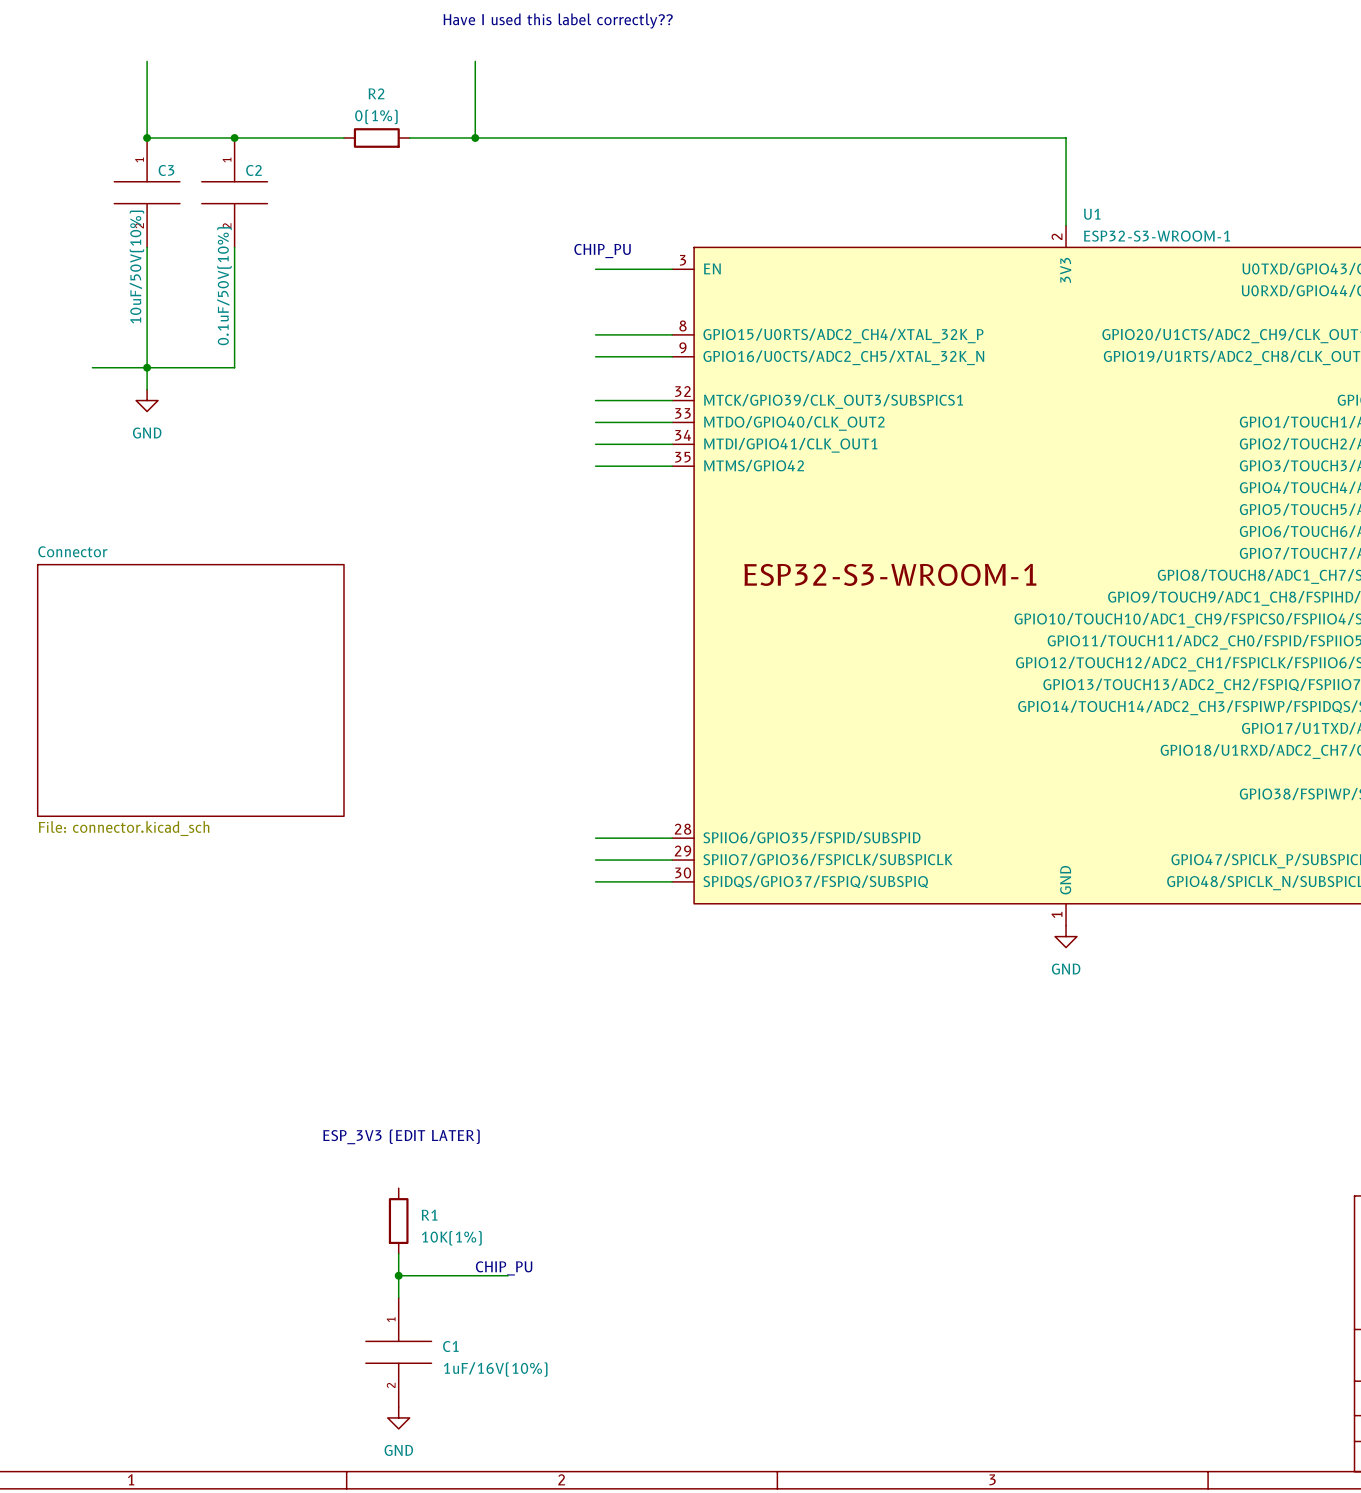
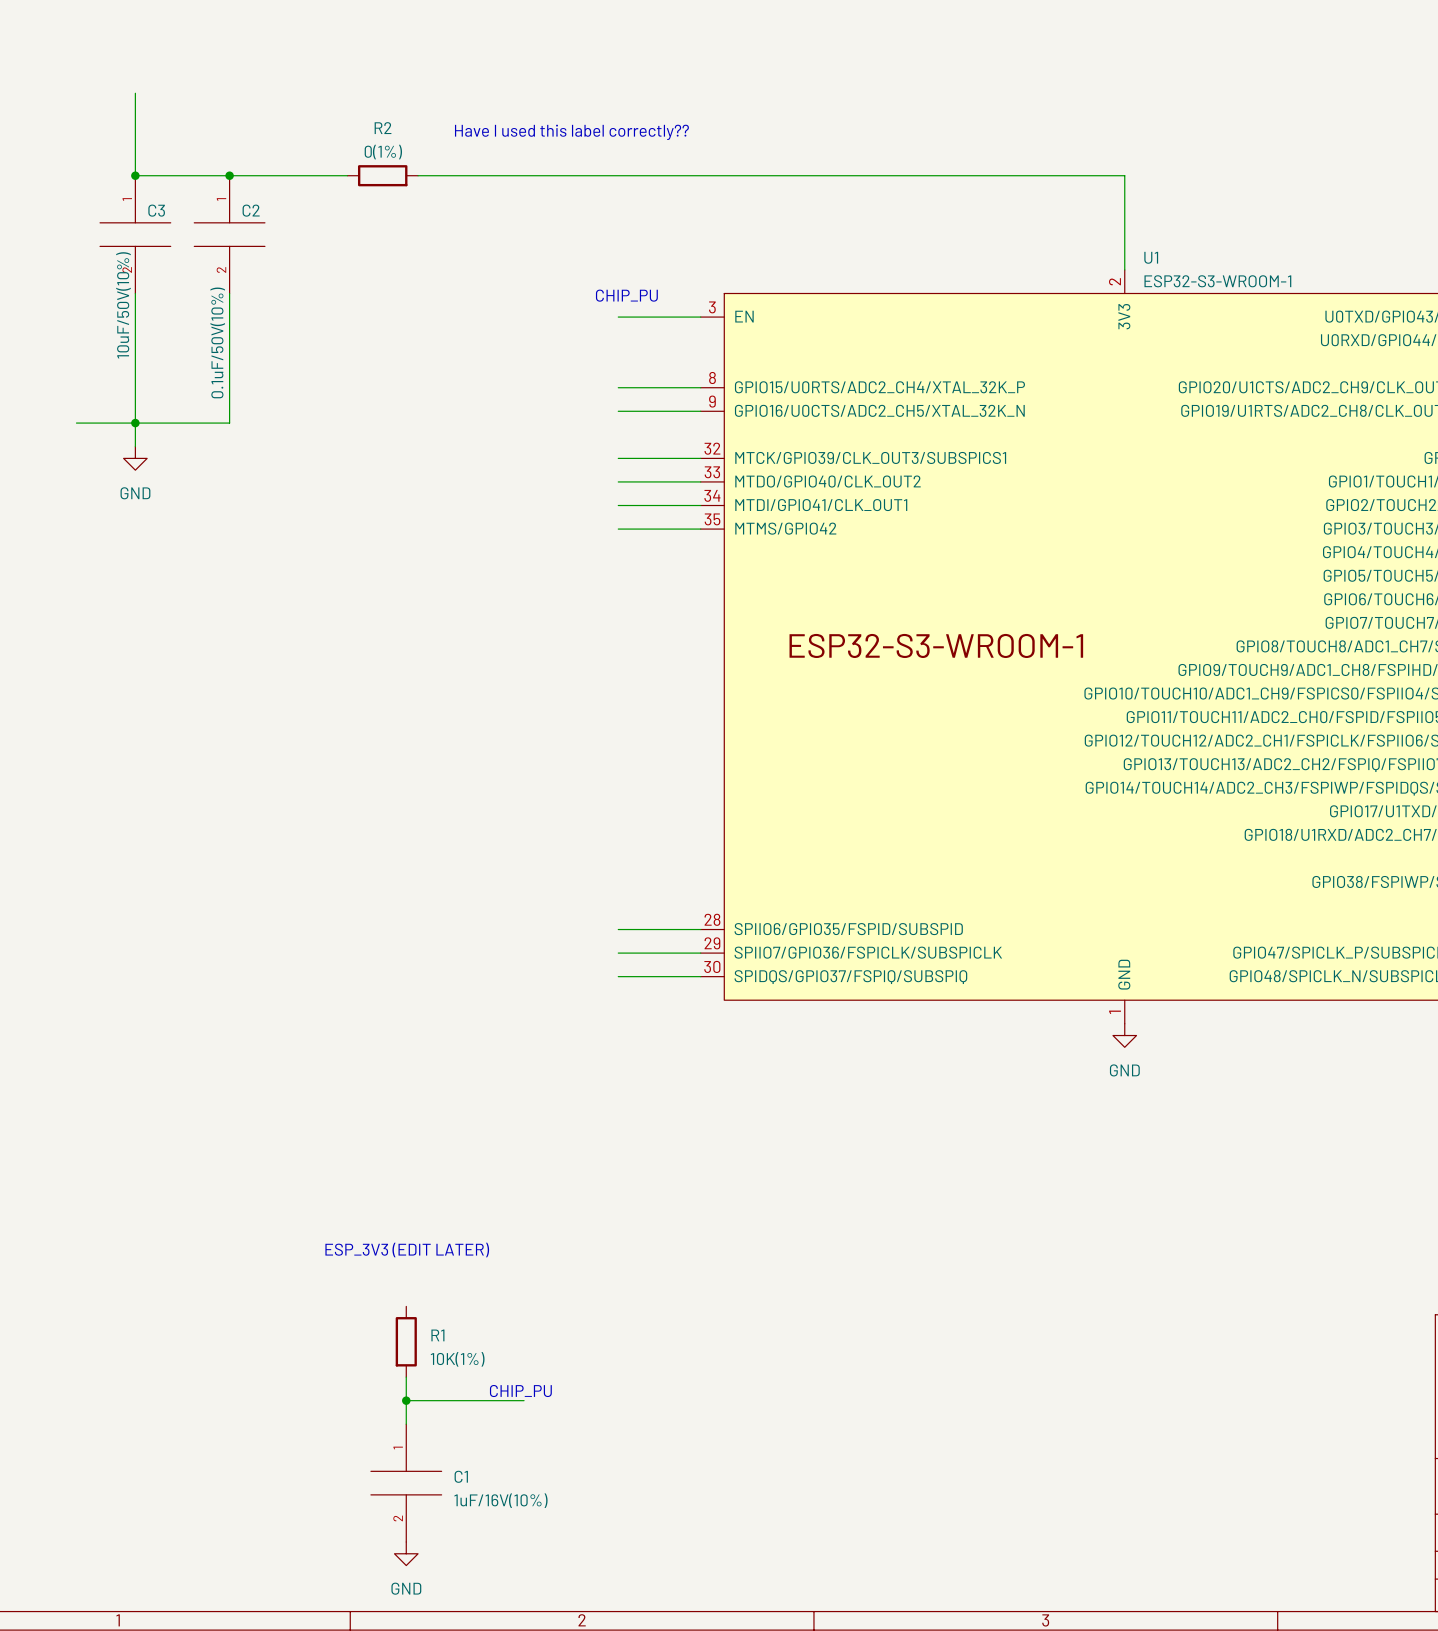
text position: Have I used this label correctly?? (558, 21) -> Have I used this label correctly?? (571, 132)
wire: (475, 61) (475, 138) -> none
junction: (475, 138) -> none
sheet Connector: File: connector.kicad_sch (190, 690) -> none

